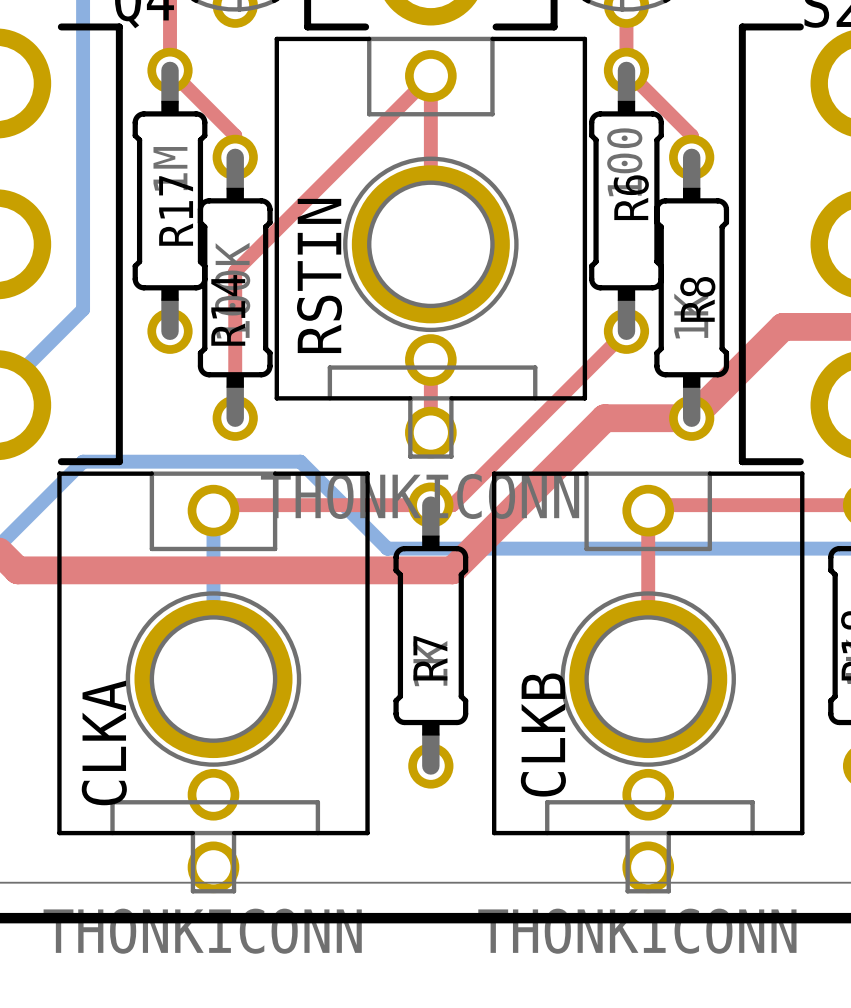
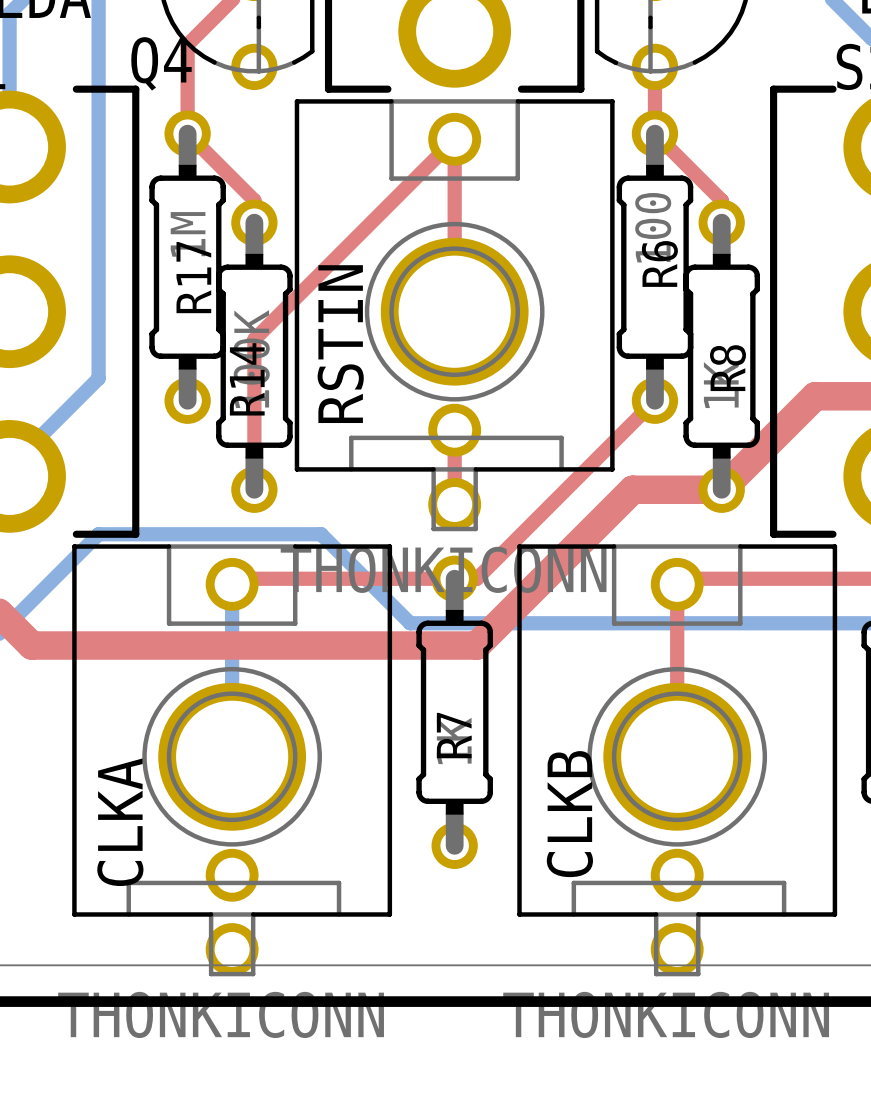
RSTIN footprint: [274, 36, 588, 459] -> [294, 99, 615, 532]
CLKA footprint: [57, 471, 370, 894] -> [72, 544, 393, 977]
CLKB footprint: [492, 471, 805, 894] -> [517, 544, 838, 977]

